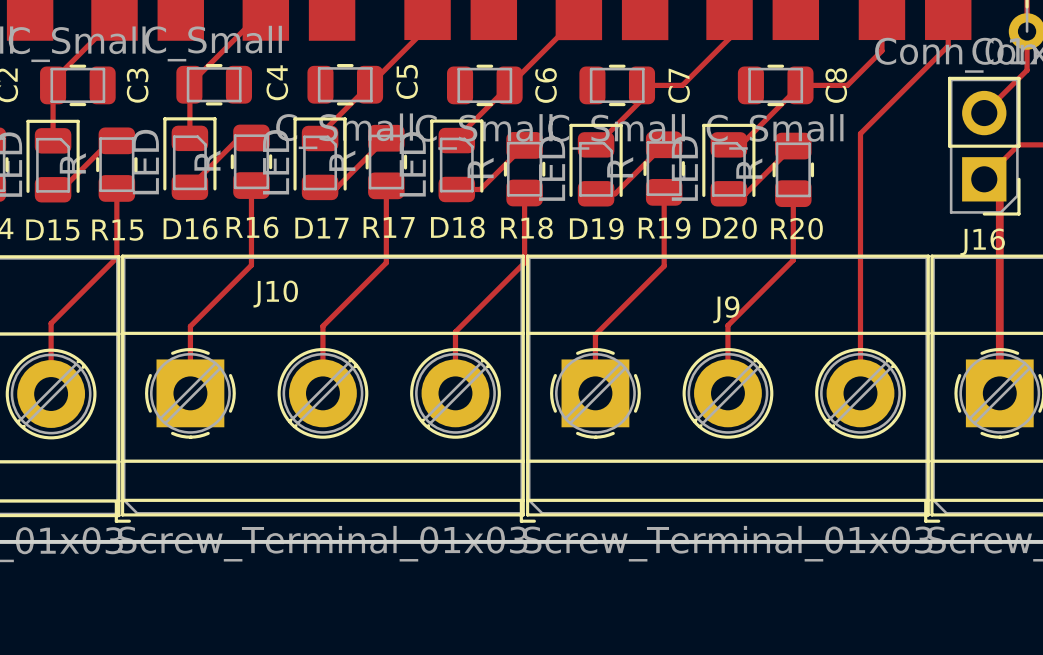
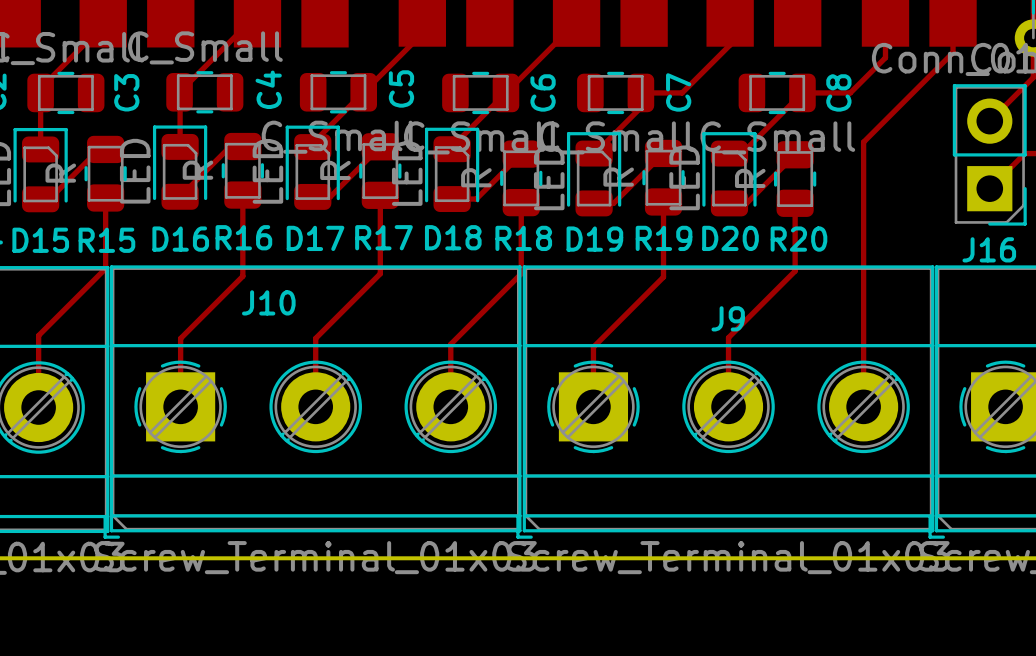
top track: (984, 179) (999, 194) (999, 393) -> none

